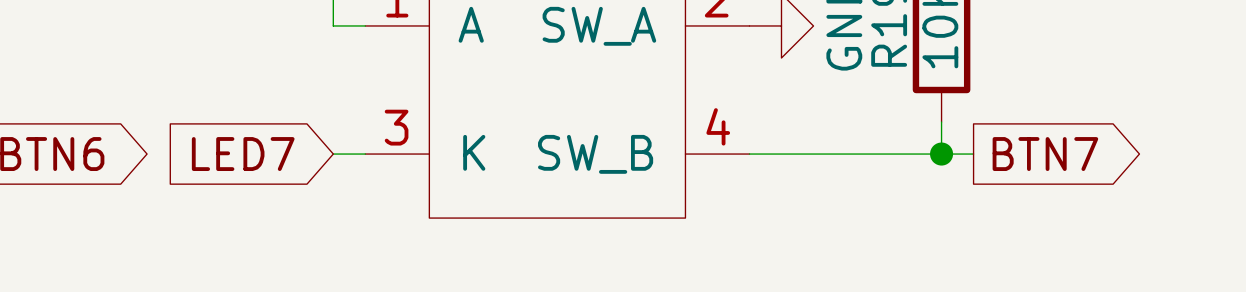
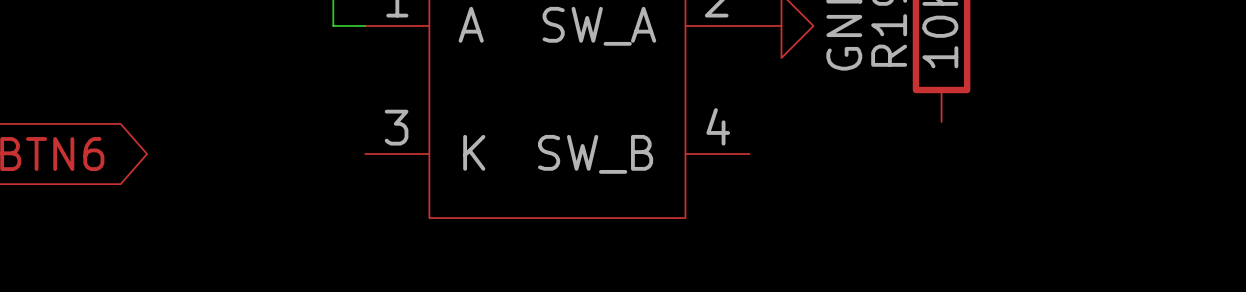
wire: (941, 122) (941, 154) -> none
global label: LED7 (243, 154) -> none
wire: (333, 154) (365, 154) -> none
wire: (749, 154) (973, 154) -> none
junction: (941, 154) -> none
global label: BTN7 (1045, 154) -> none

